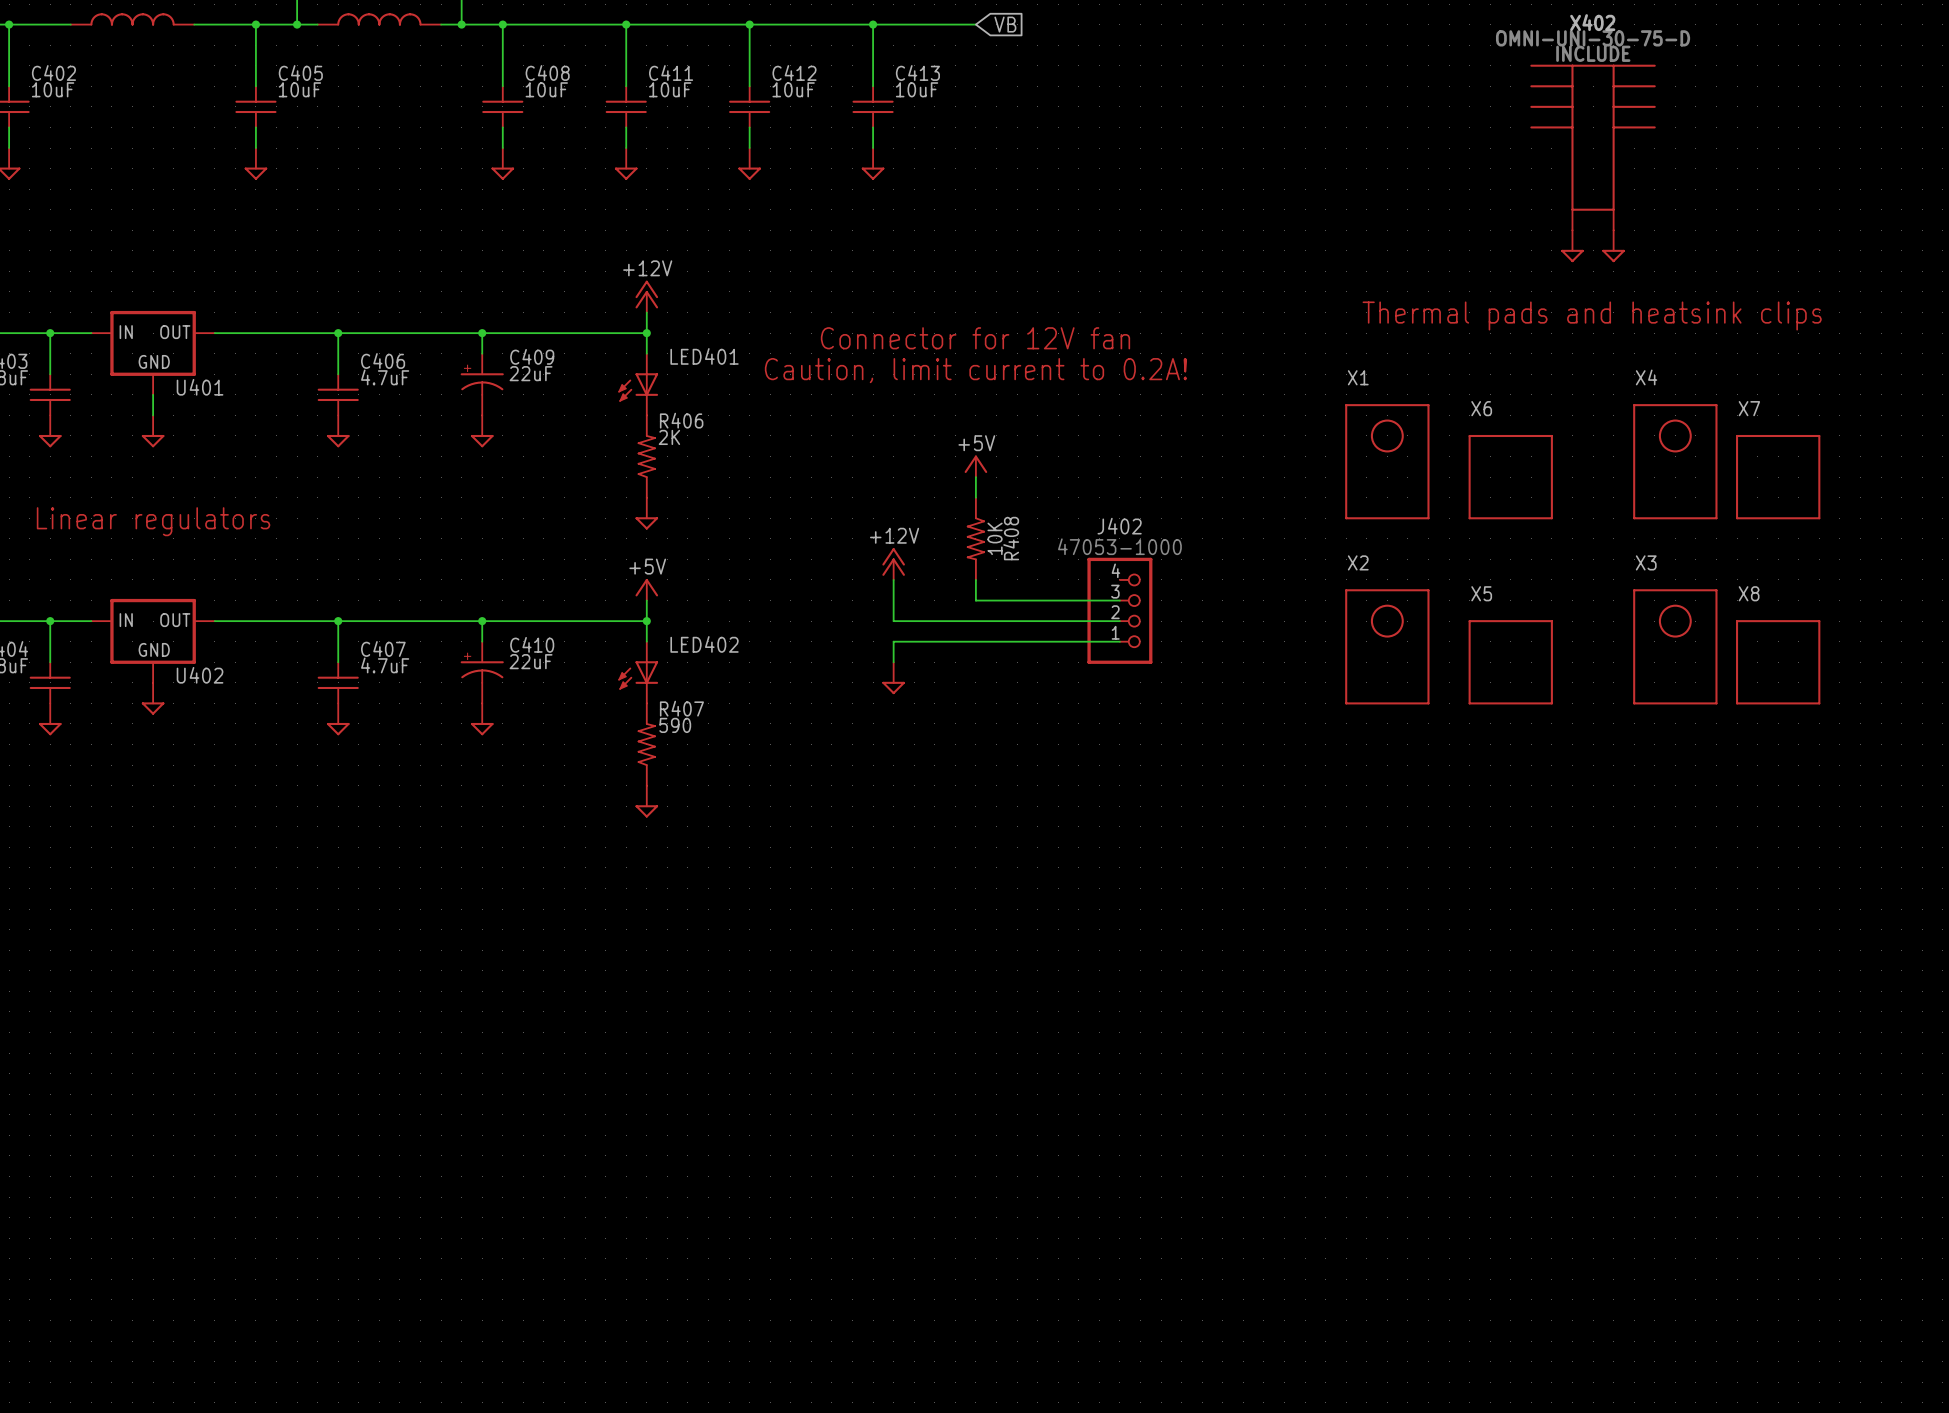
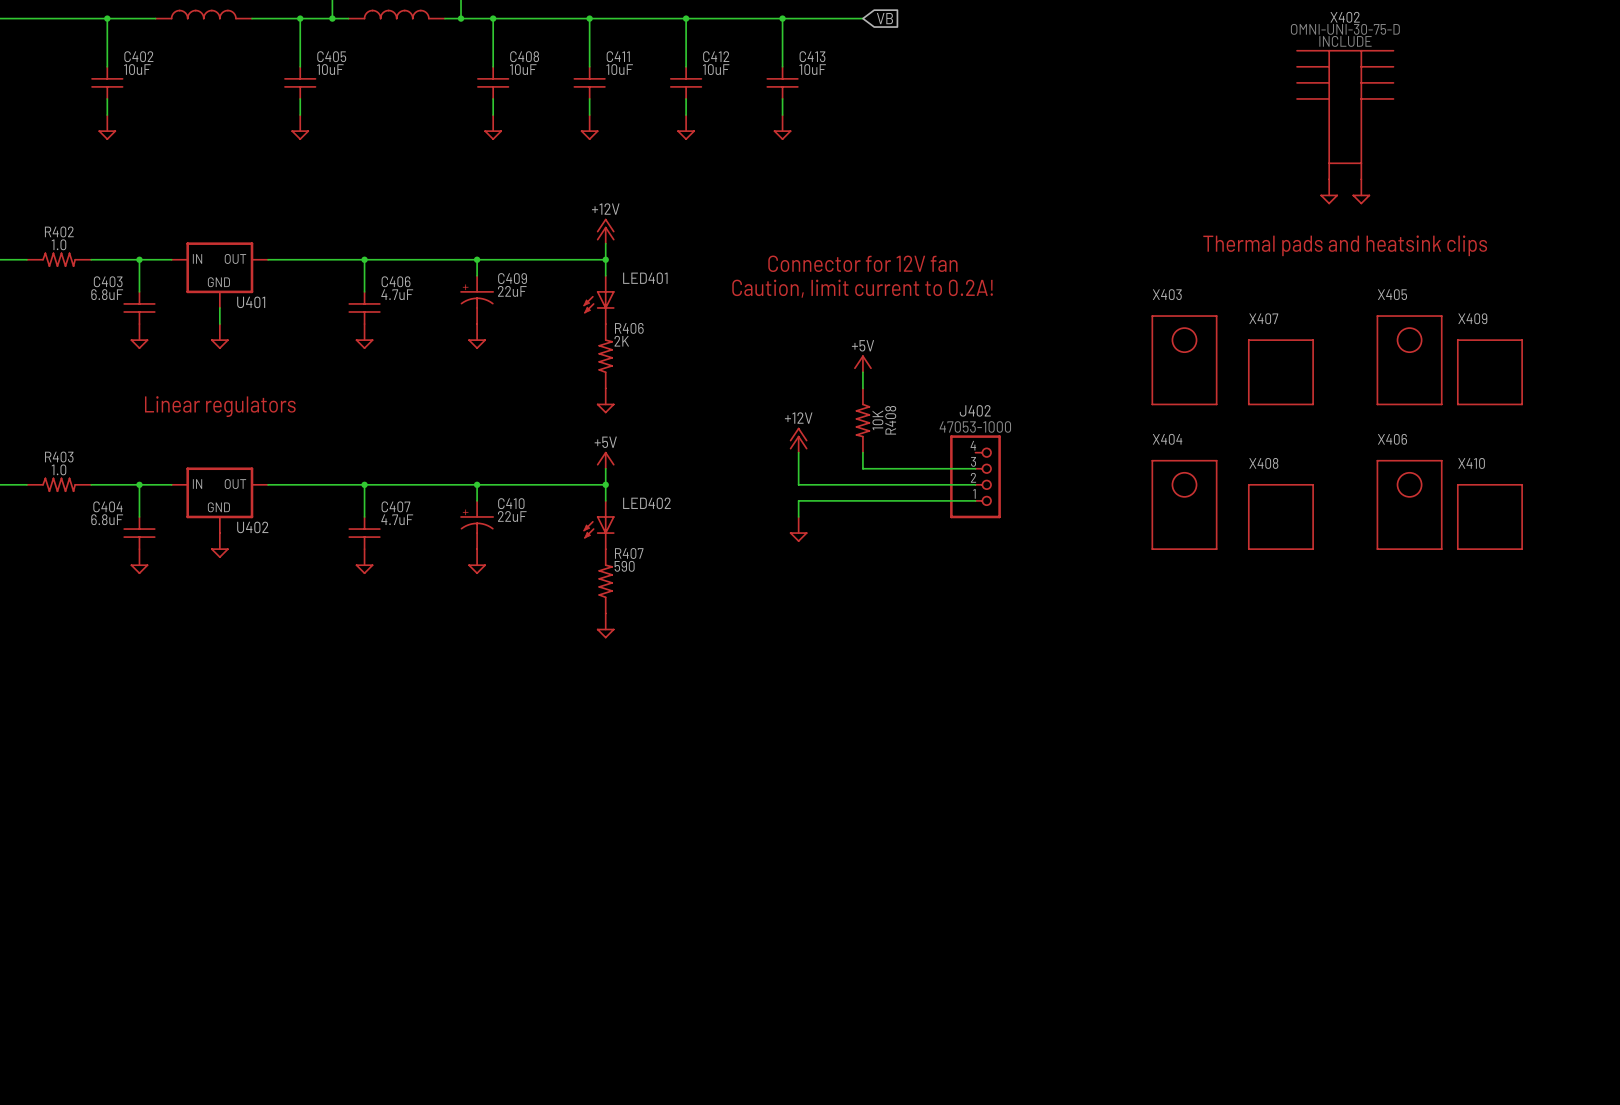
X1 name: X1 (1358, 377) -> X403 (1167, 294)
X4 name: X4 (1646, 377) -> X405 (1392, 294)
X6 name: X6 (1481, 408) -> X407 (1263, 318)
X7 name: X7 (1749, 408) -> X409 (1472, 318)
X2 name: X2 (1358, 562) -> X404 (1167, 439)
X3 name: X3 (1646, 562) -> X406 (1392, 439)
X5 name: X5 (1481, 593) -> X408 (1263, 463)
X8 name: X8 (1749, 593) -> X410 (1471, 463)

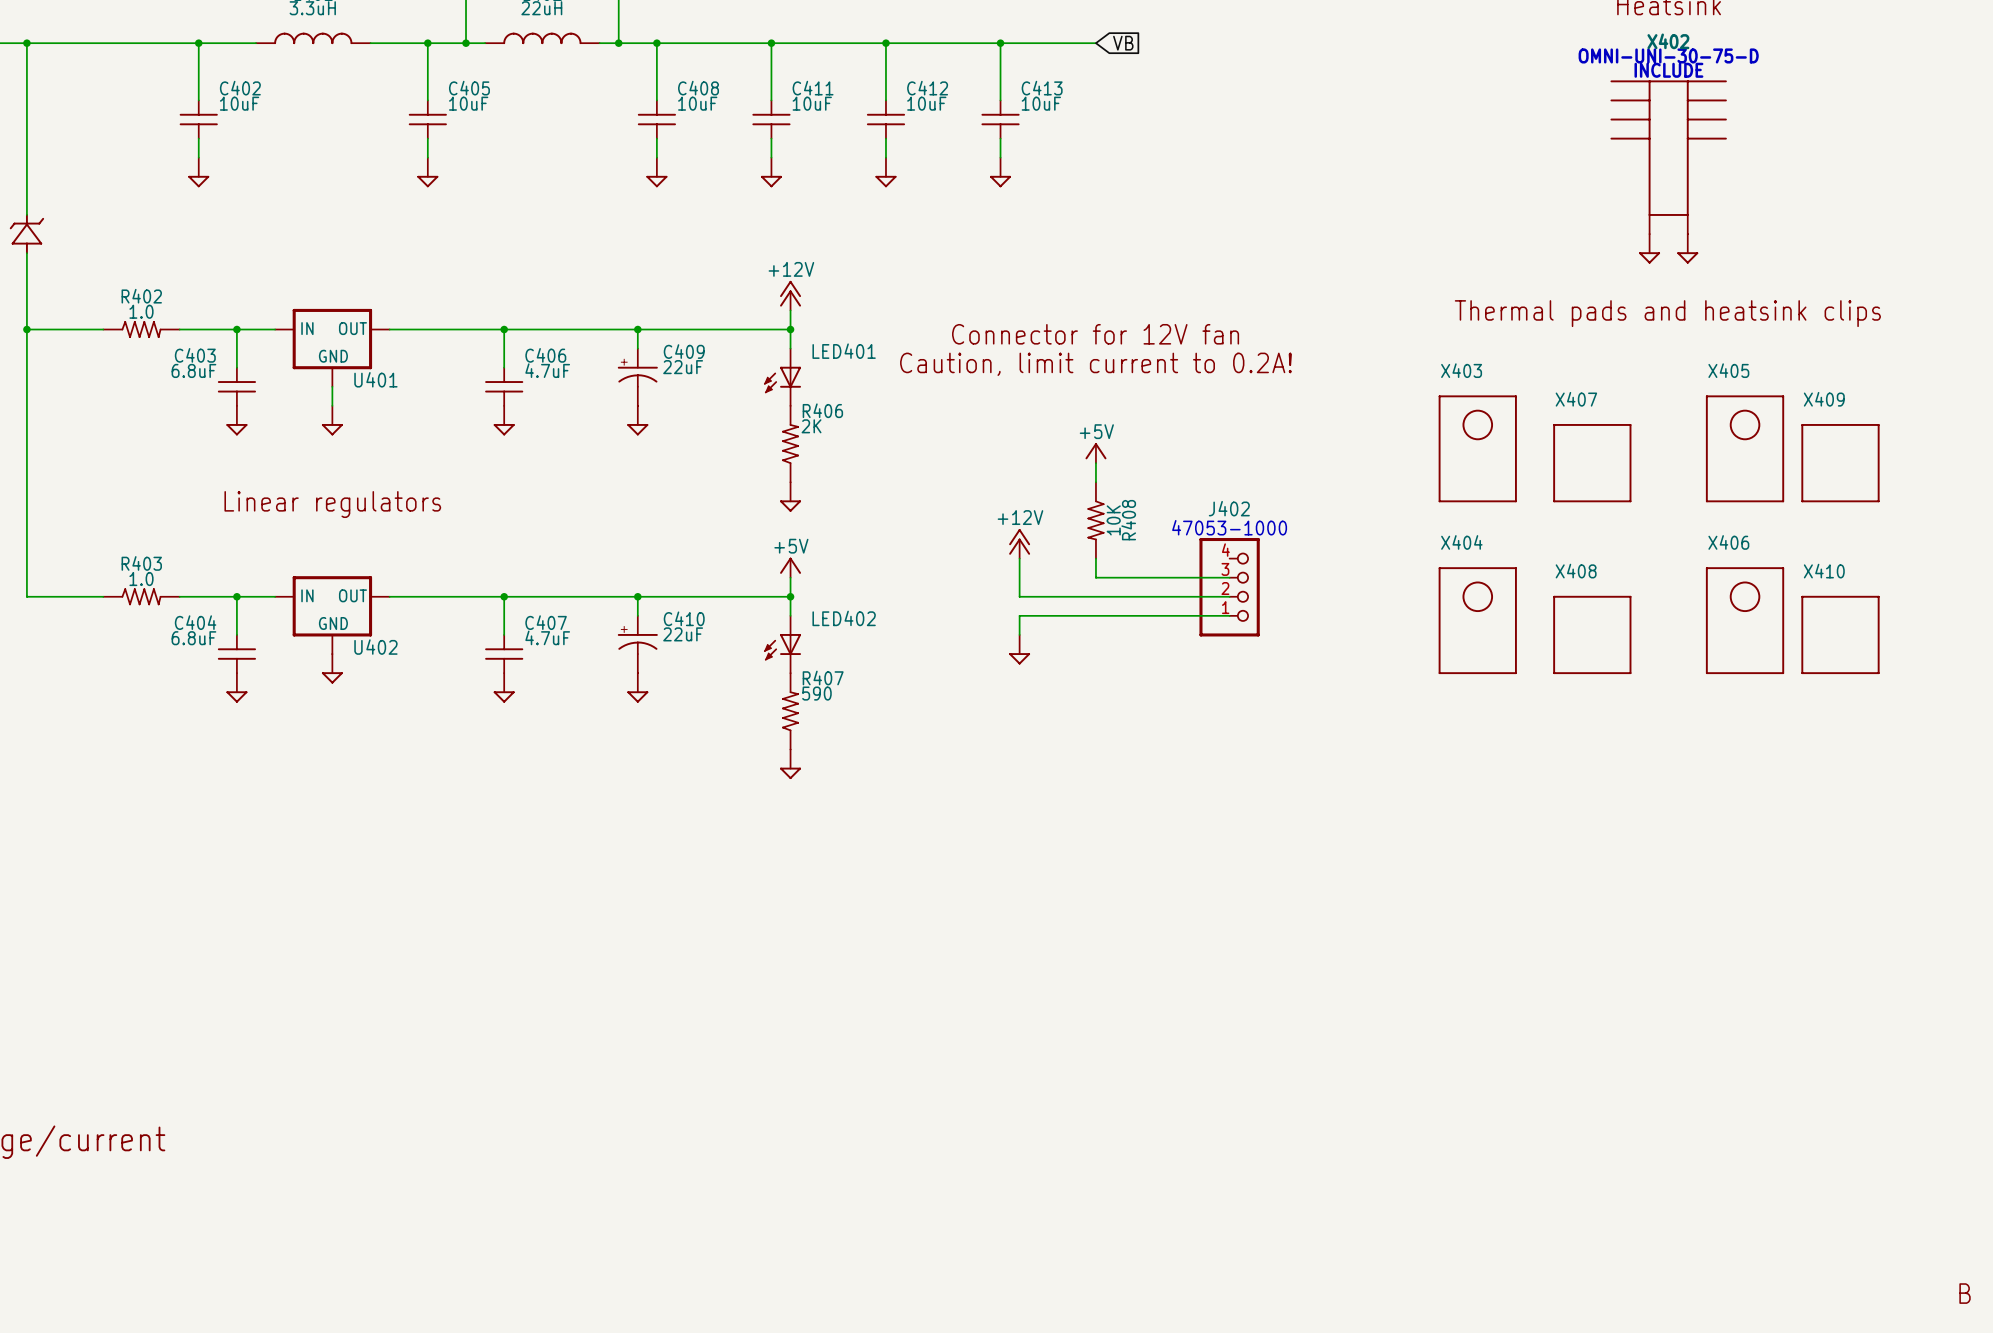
text: none -> B (1965, 1293)

